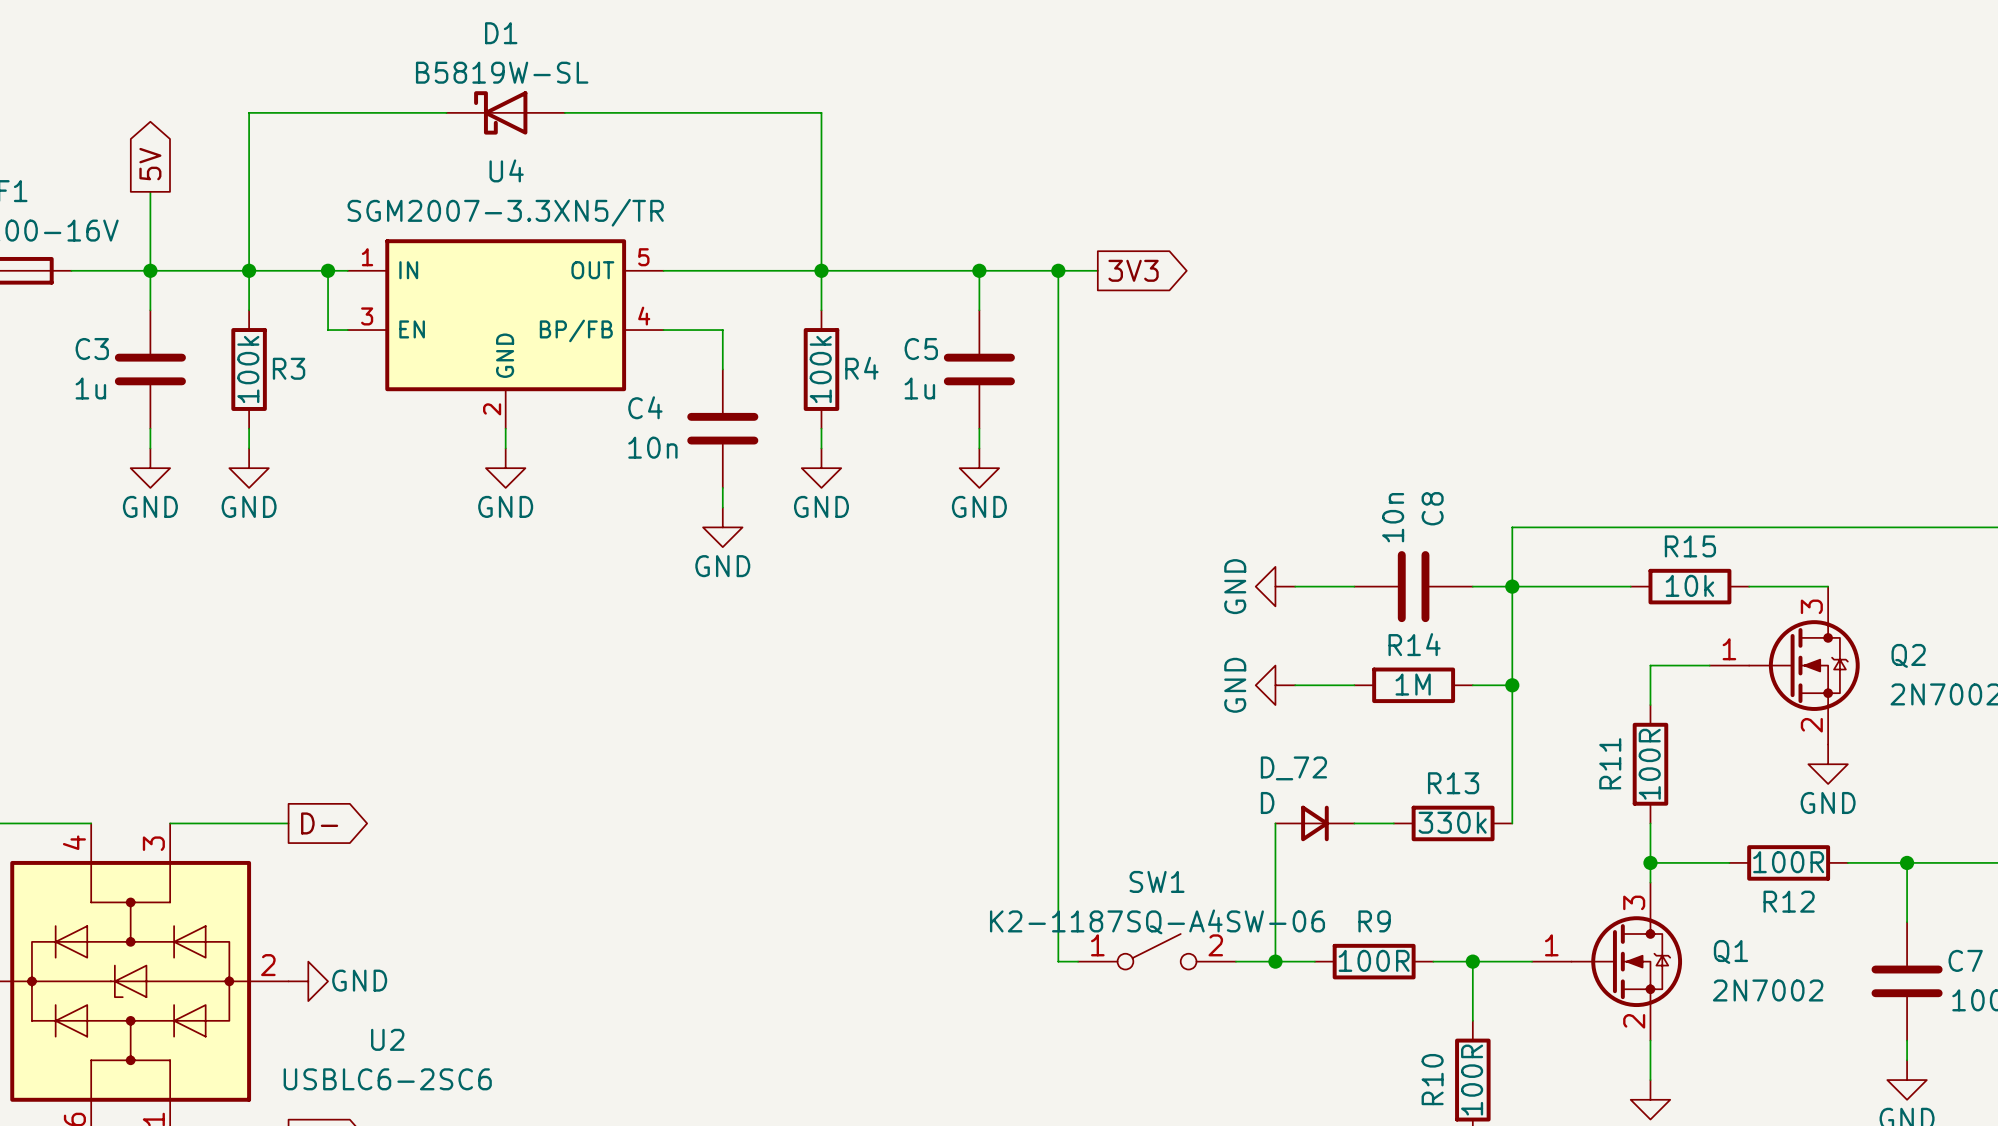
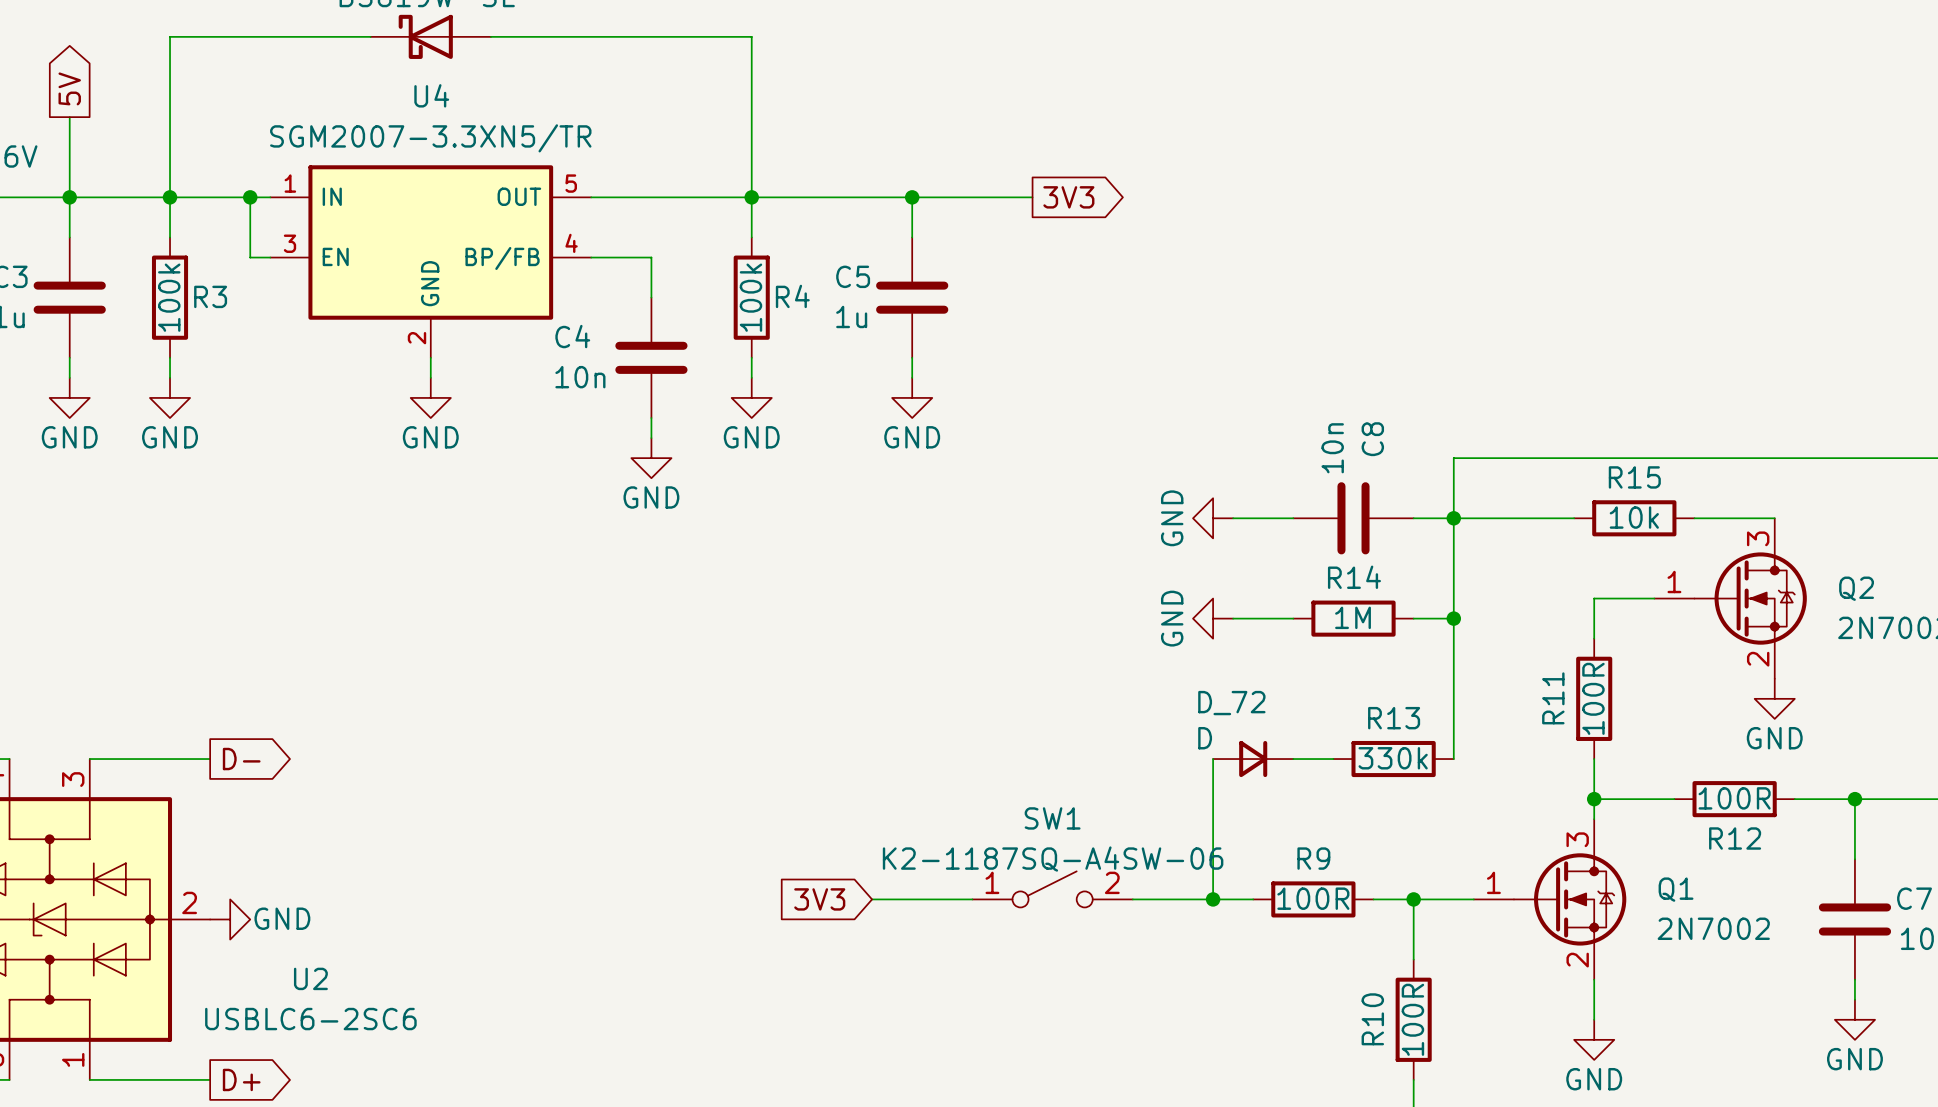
wire: (1058, 270) (1058, 961) (1078, 961) -> none
junction: (1058, 270) -> none
SW1 position: (1157, 951) -> (1052, 889)
global label: none -> 3V3 (819, 899)
wire: none -> (872, 899) (972, 899)

